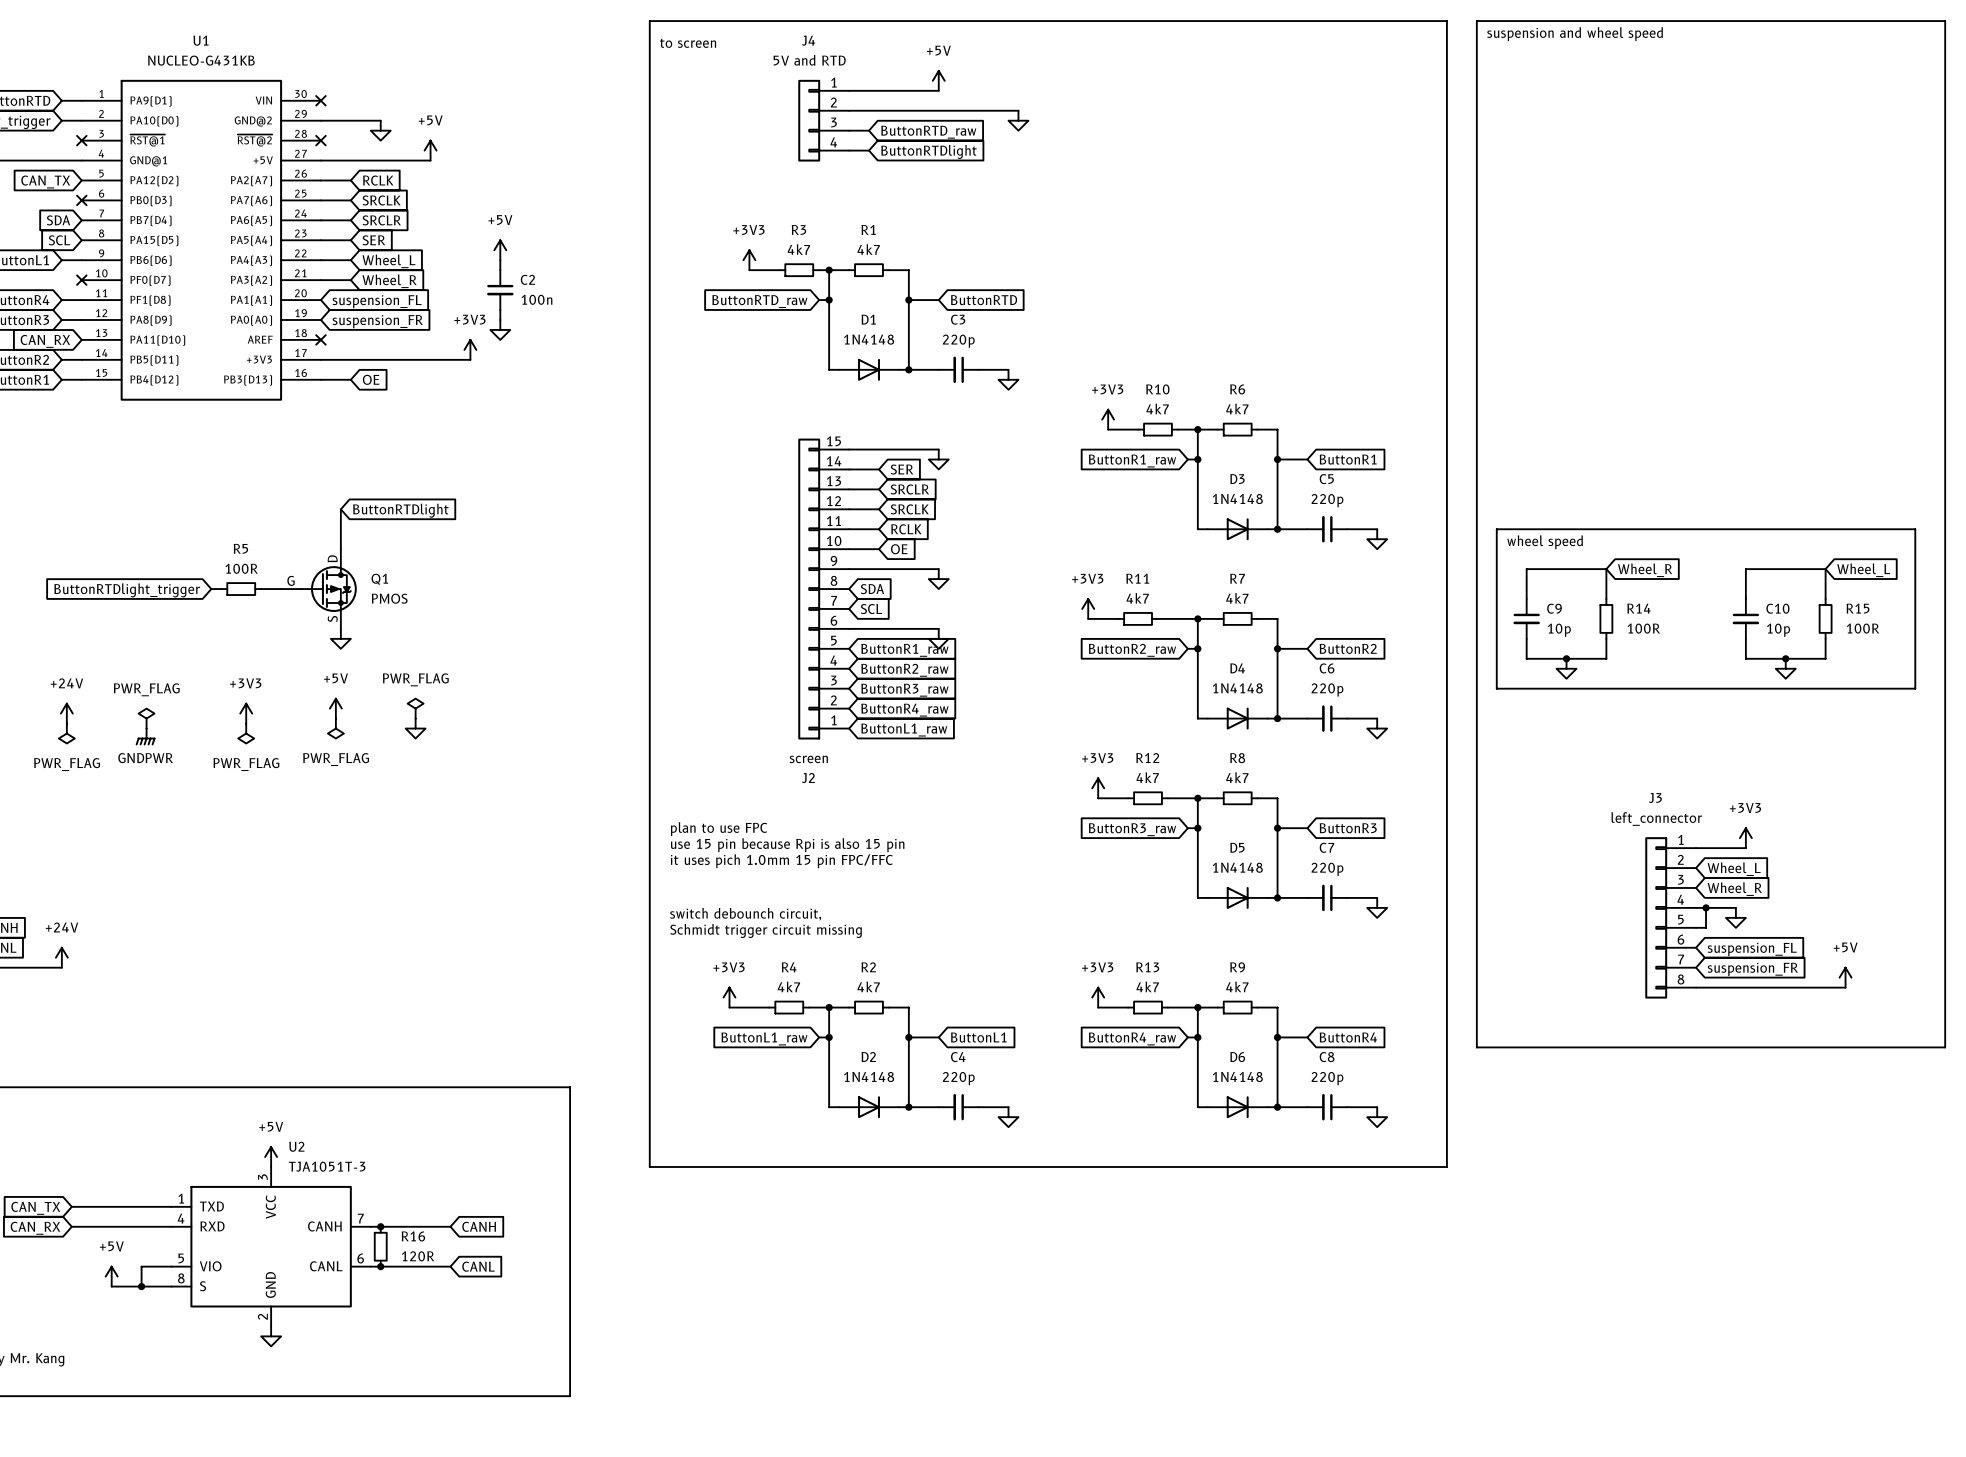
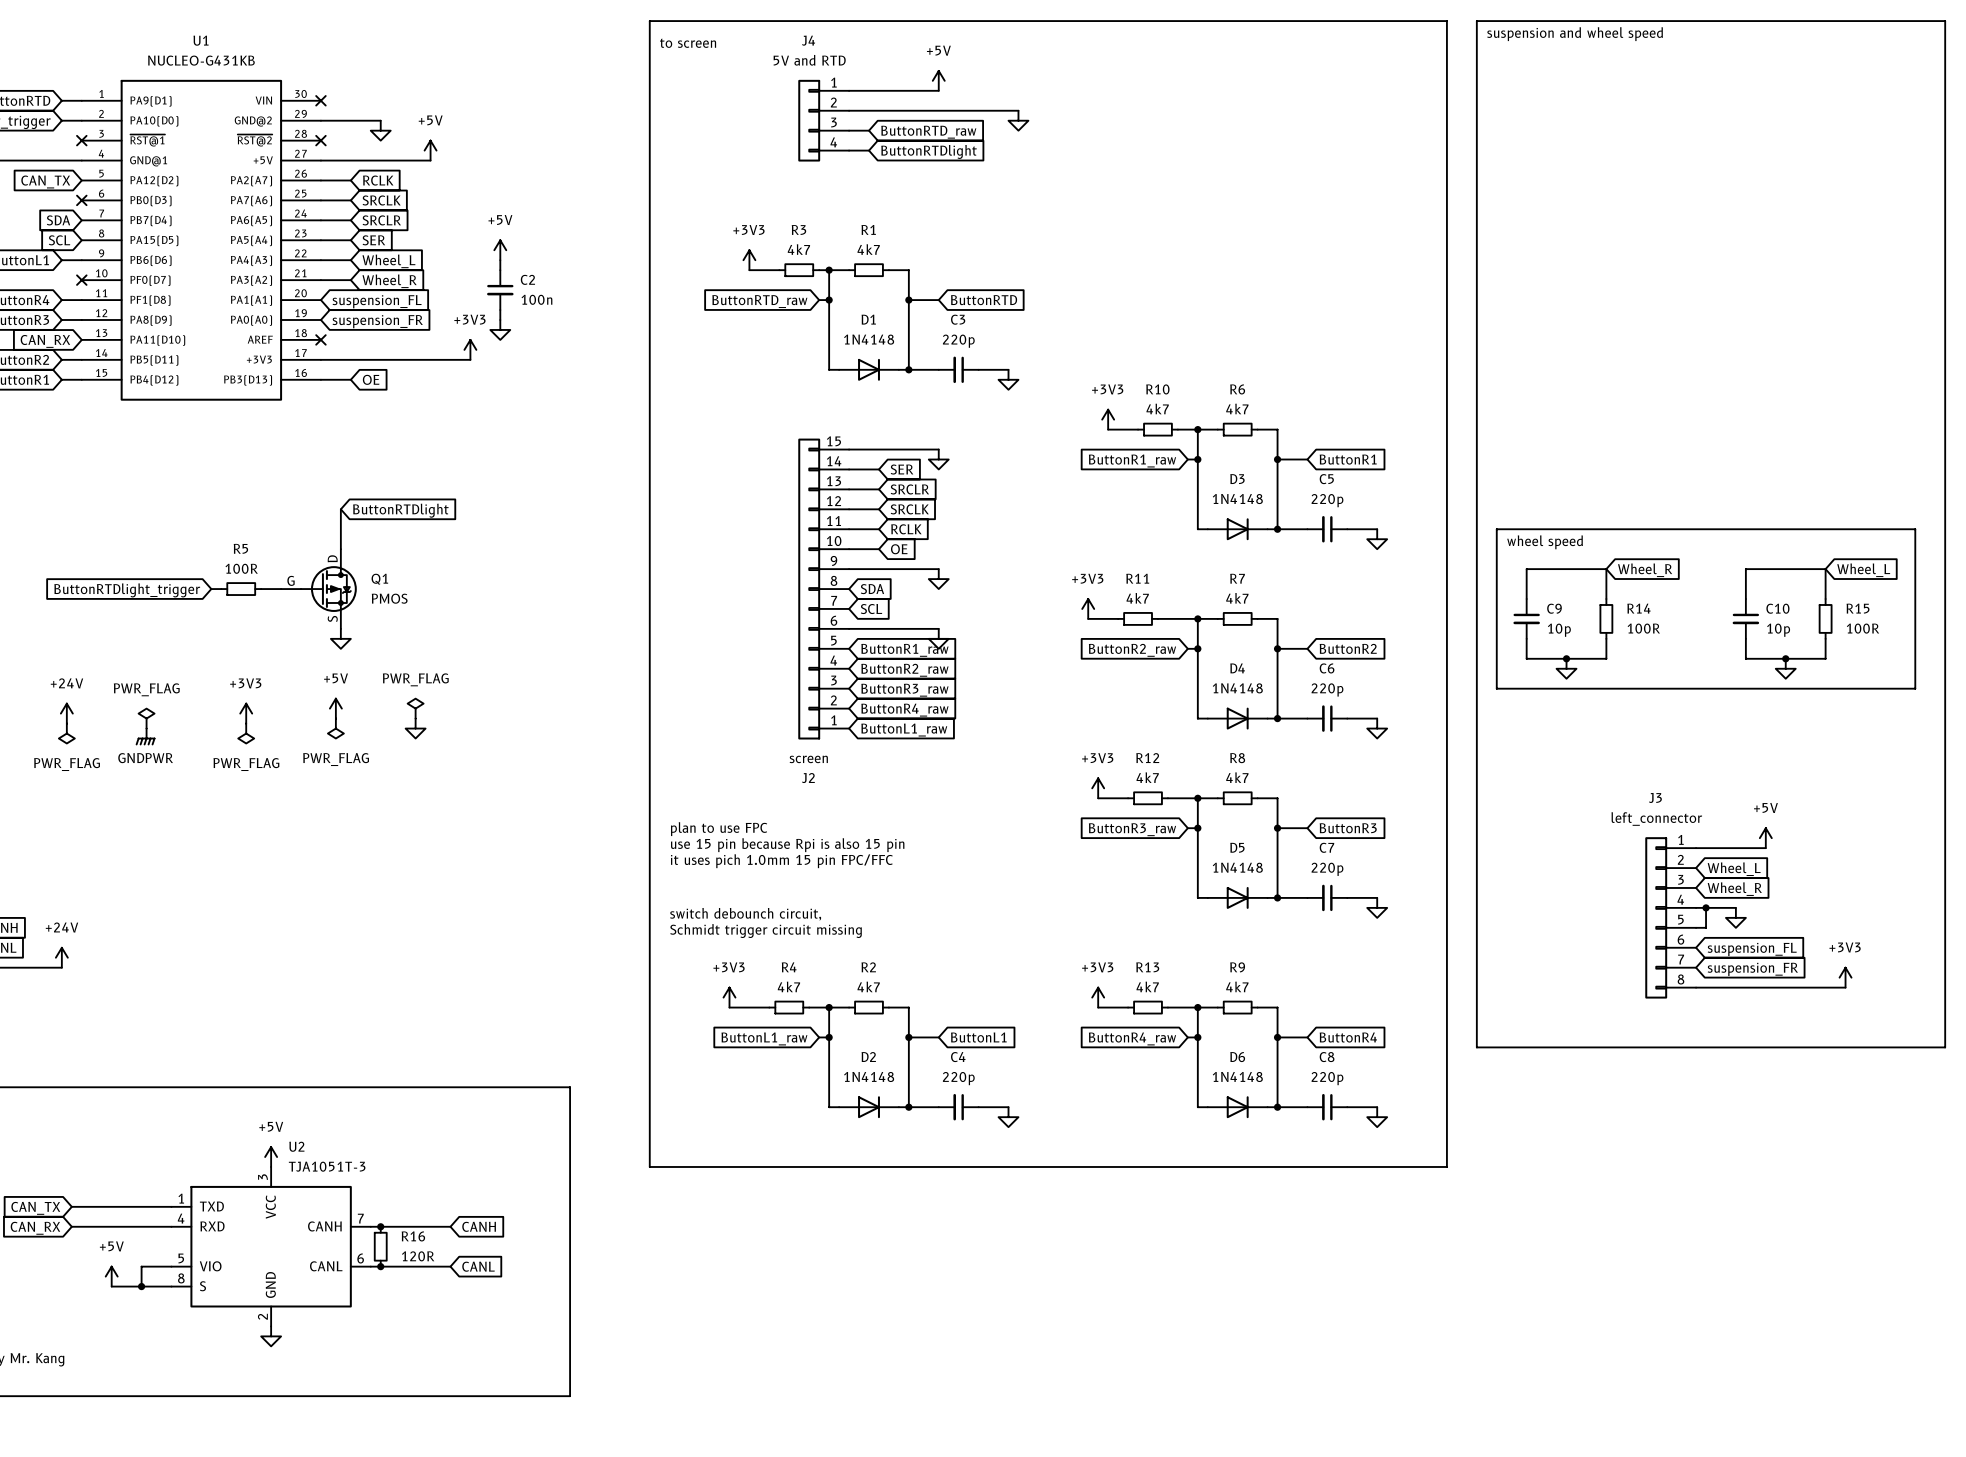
power symbol: +3V3 (1745, 838) -> none
power symbol: none -> +5V (1765, 838)
wire: none -> (1745, 848) (1765, 848)
power symbol: +5V (1845, 977) -> +3V3 (1845, 977)

